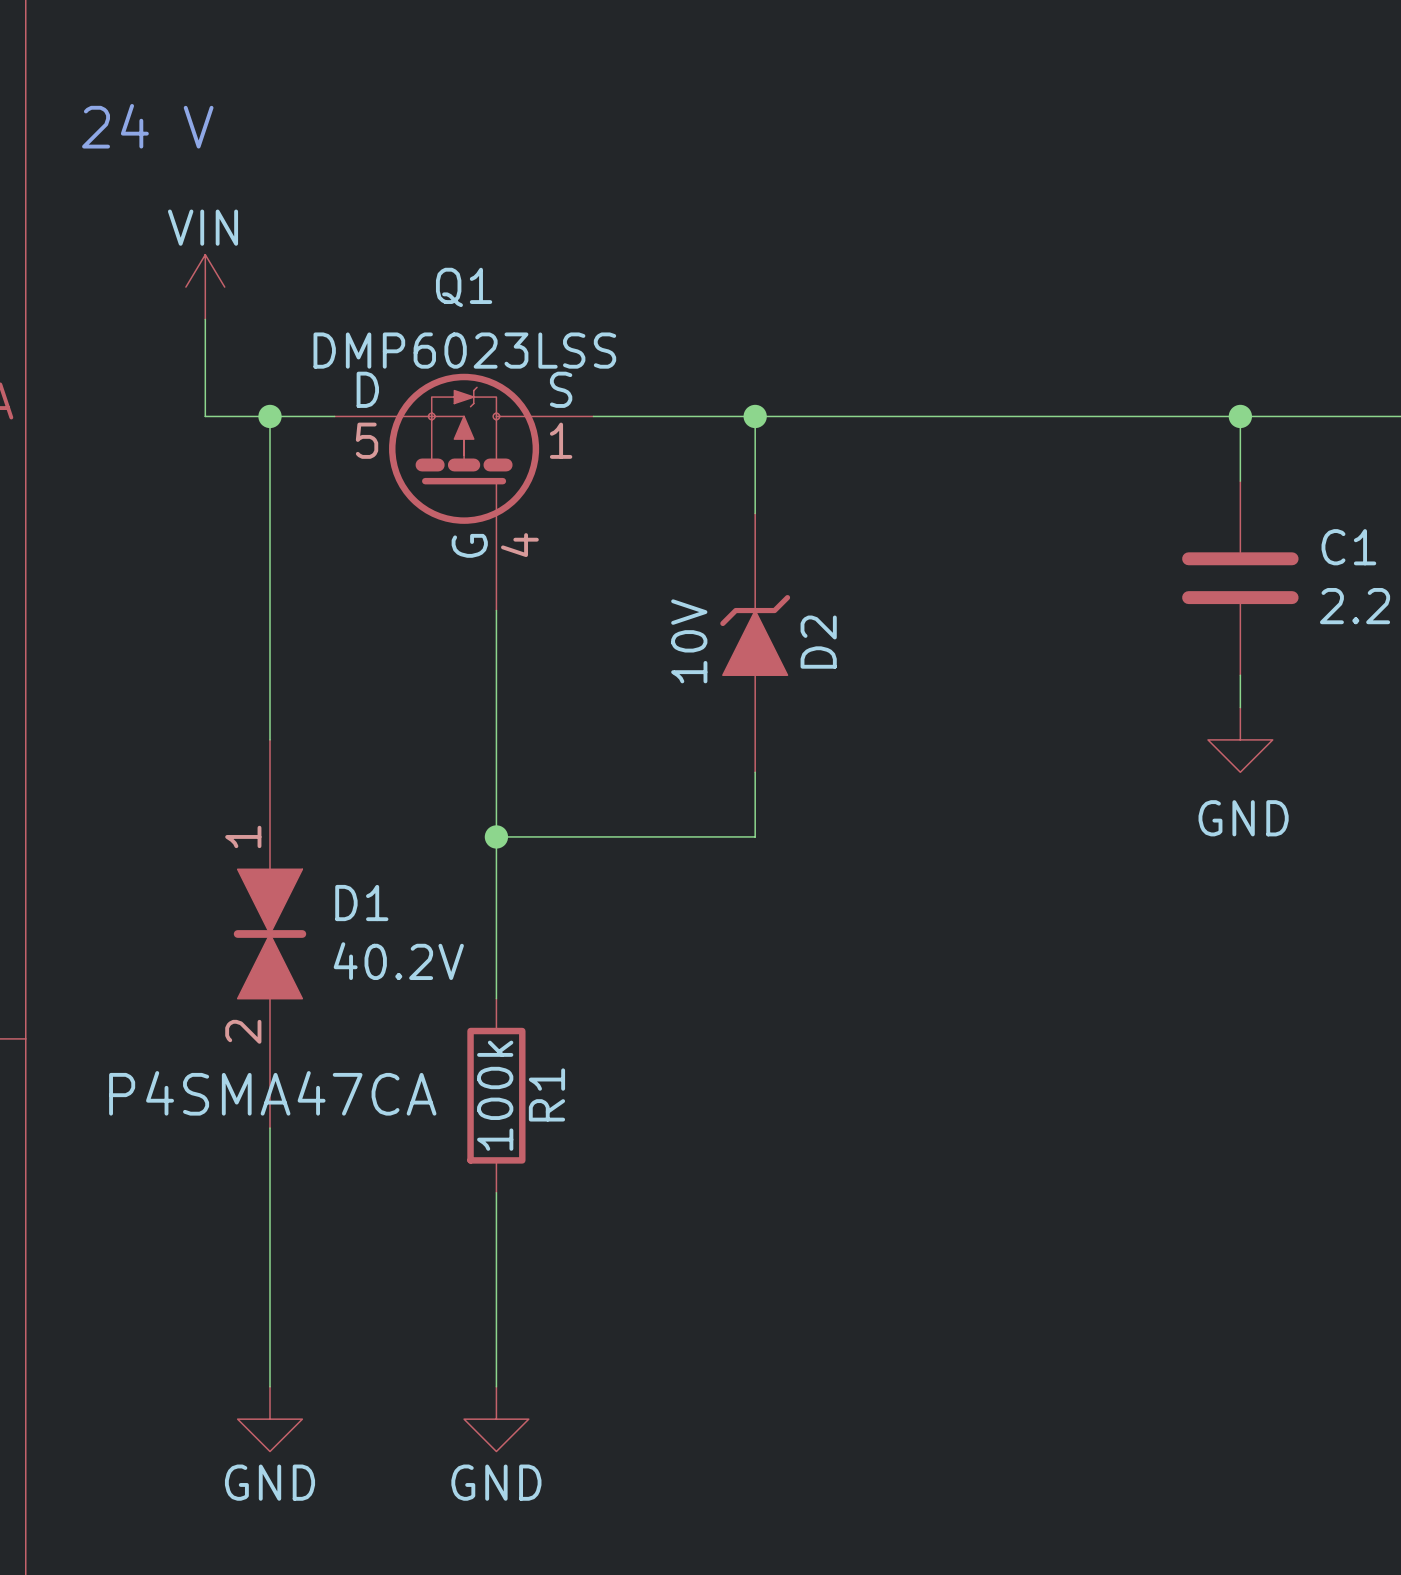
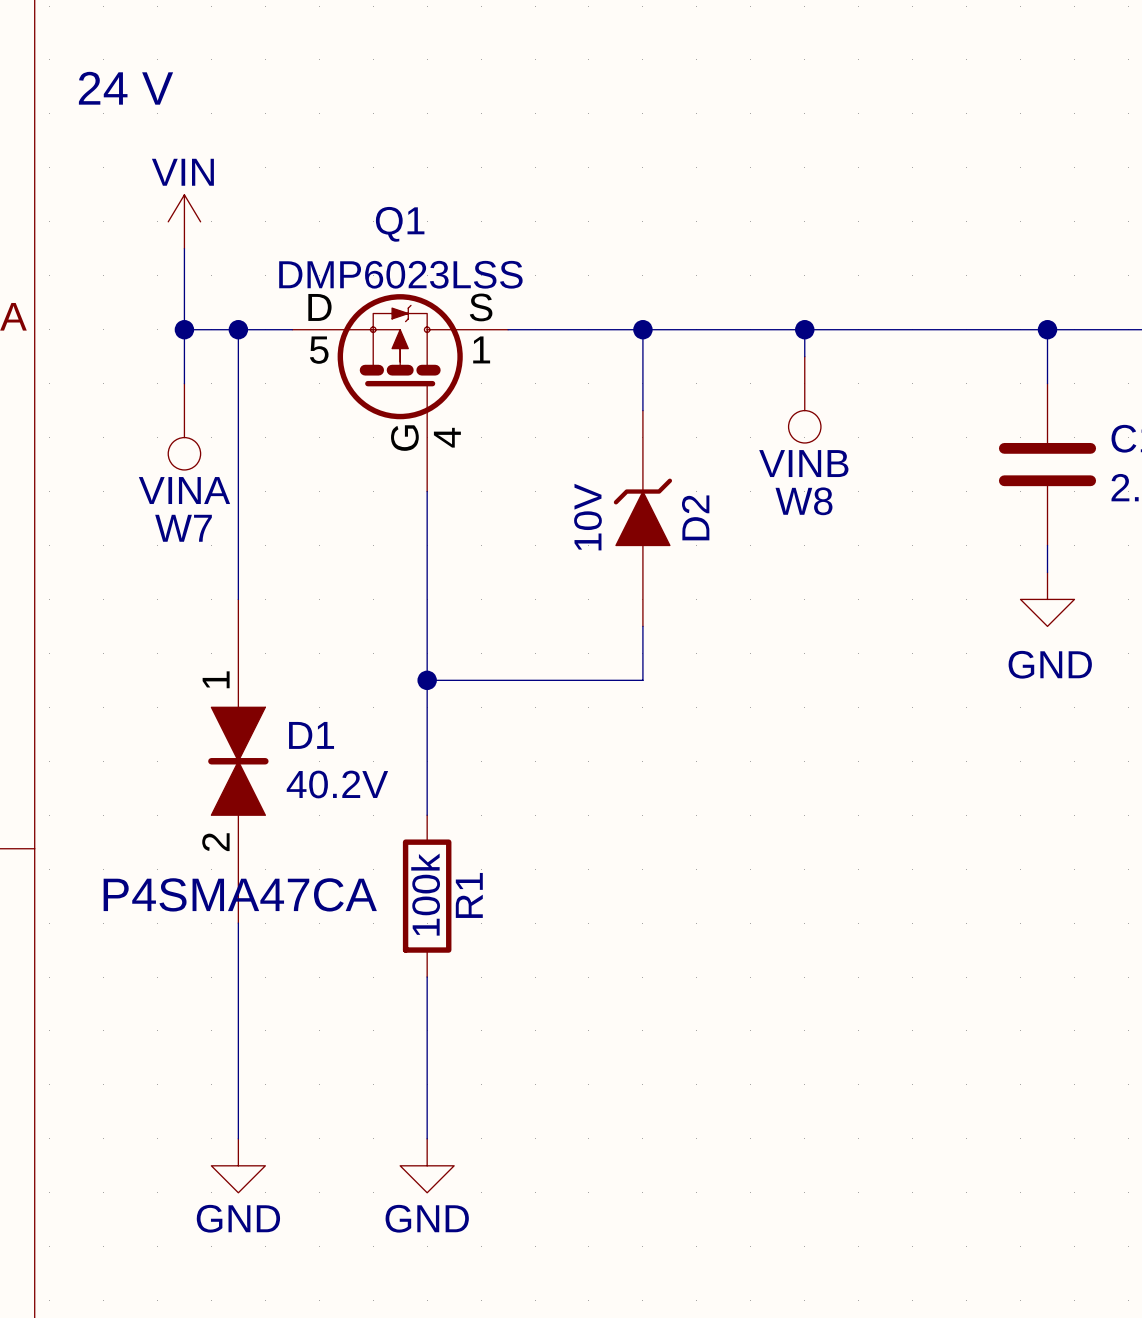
wire: none -> (184, 329) (184, 383)
junction: none -> (184, 329)
wire: none -> (804, 329) (804, 356)
junction: none -> (804, 329)
W8: none -> VINB (804, 399)
W7: none -> VINA (184, 426)

